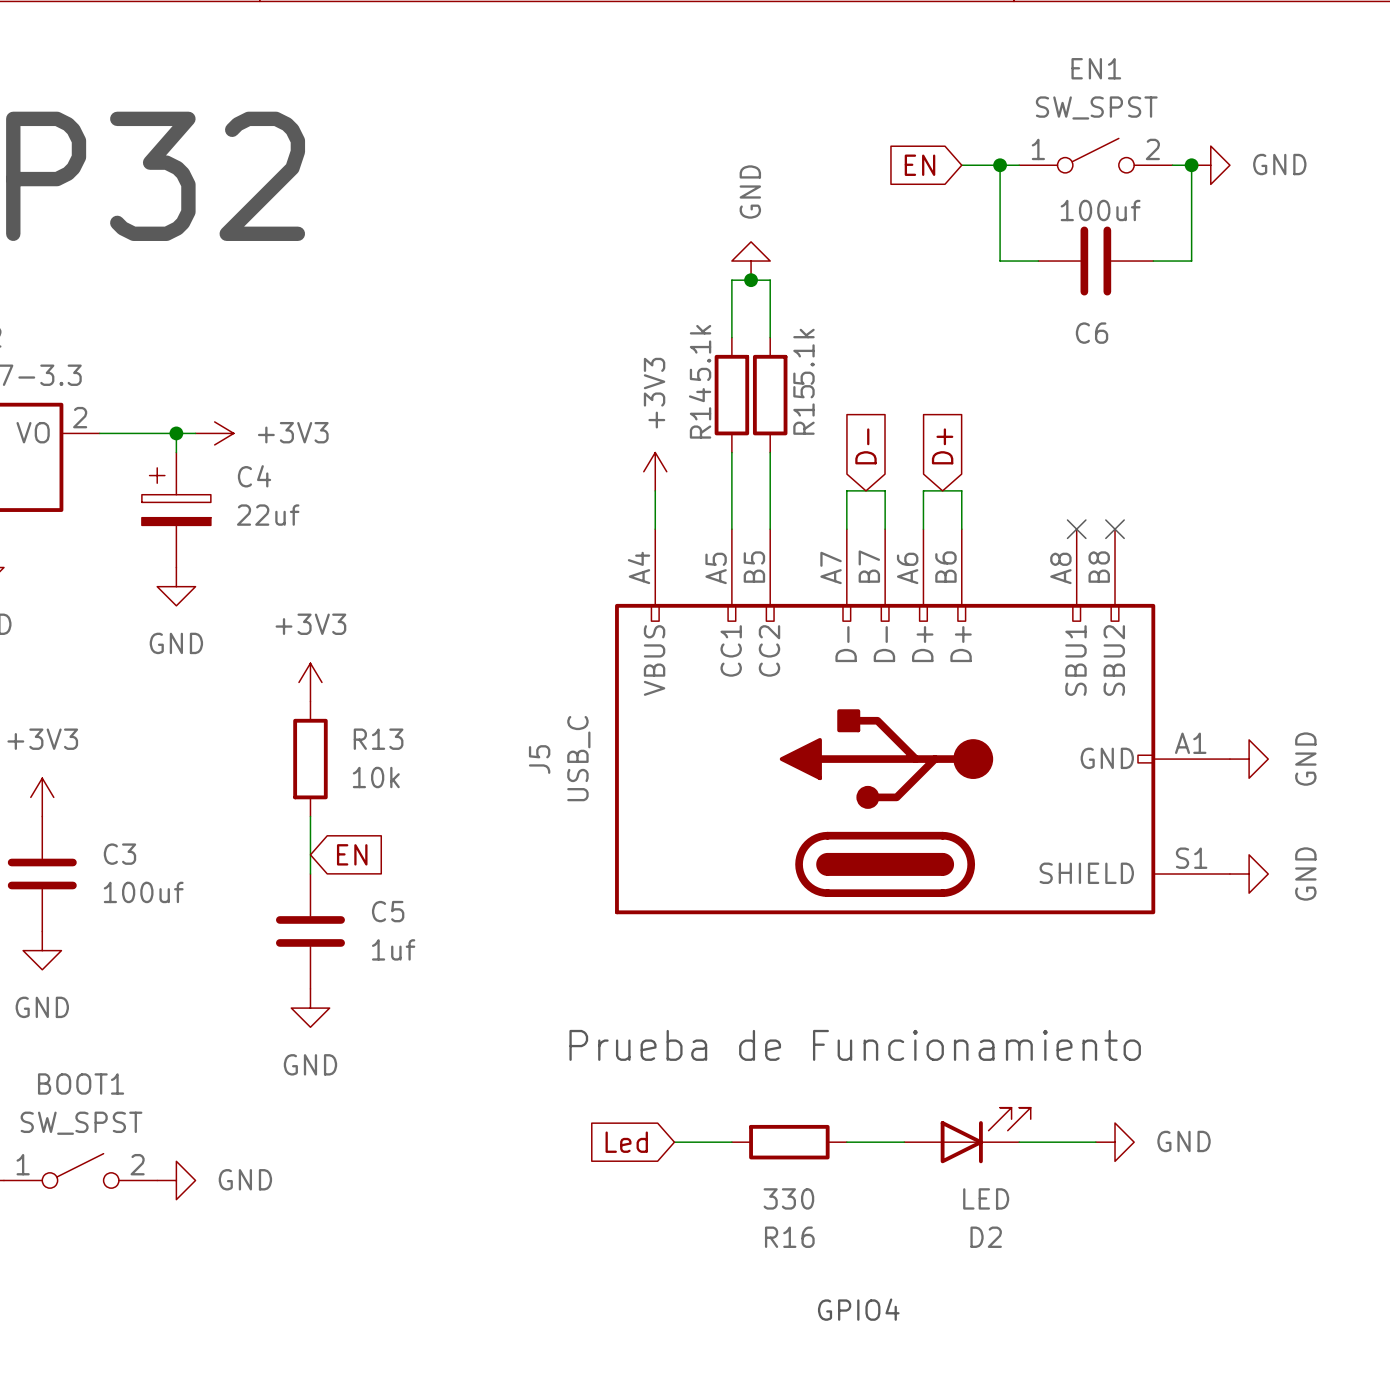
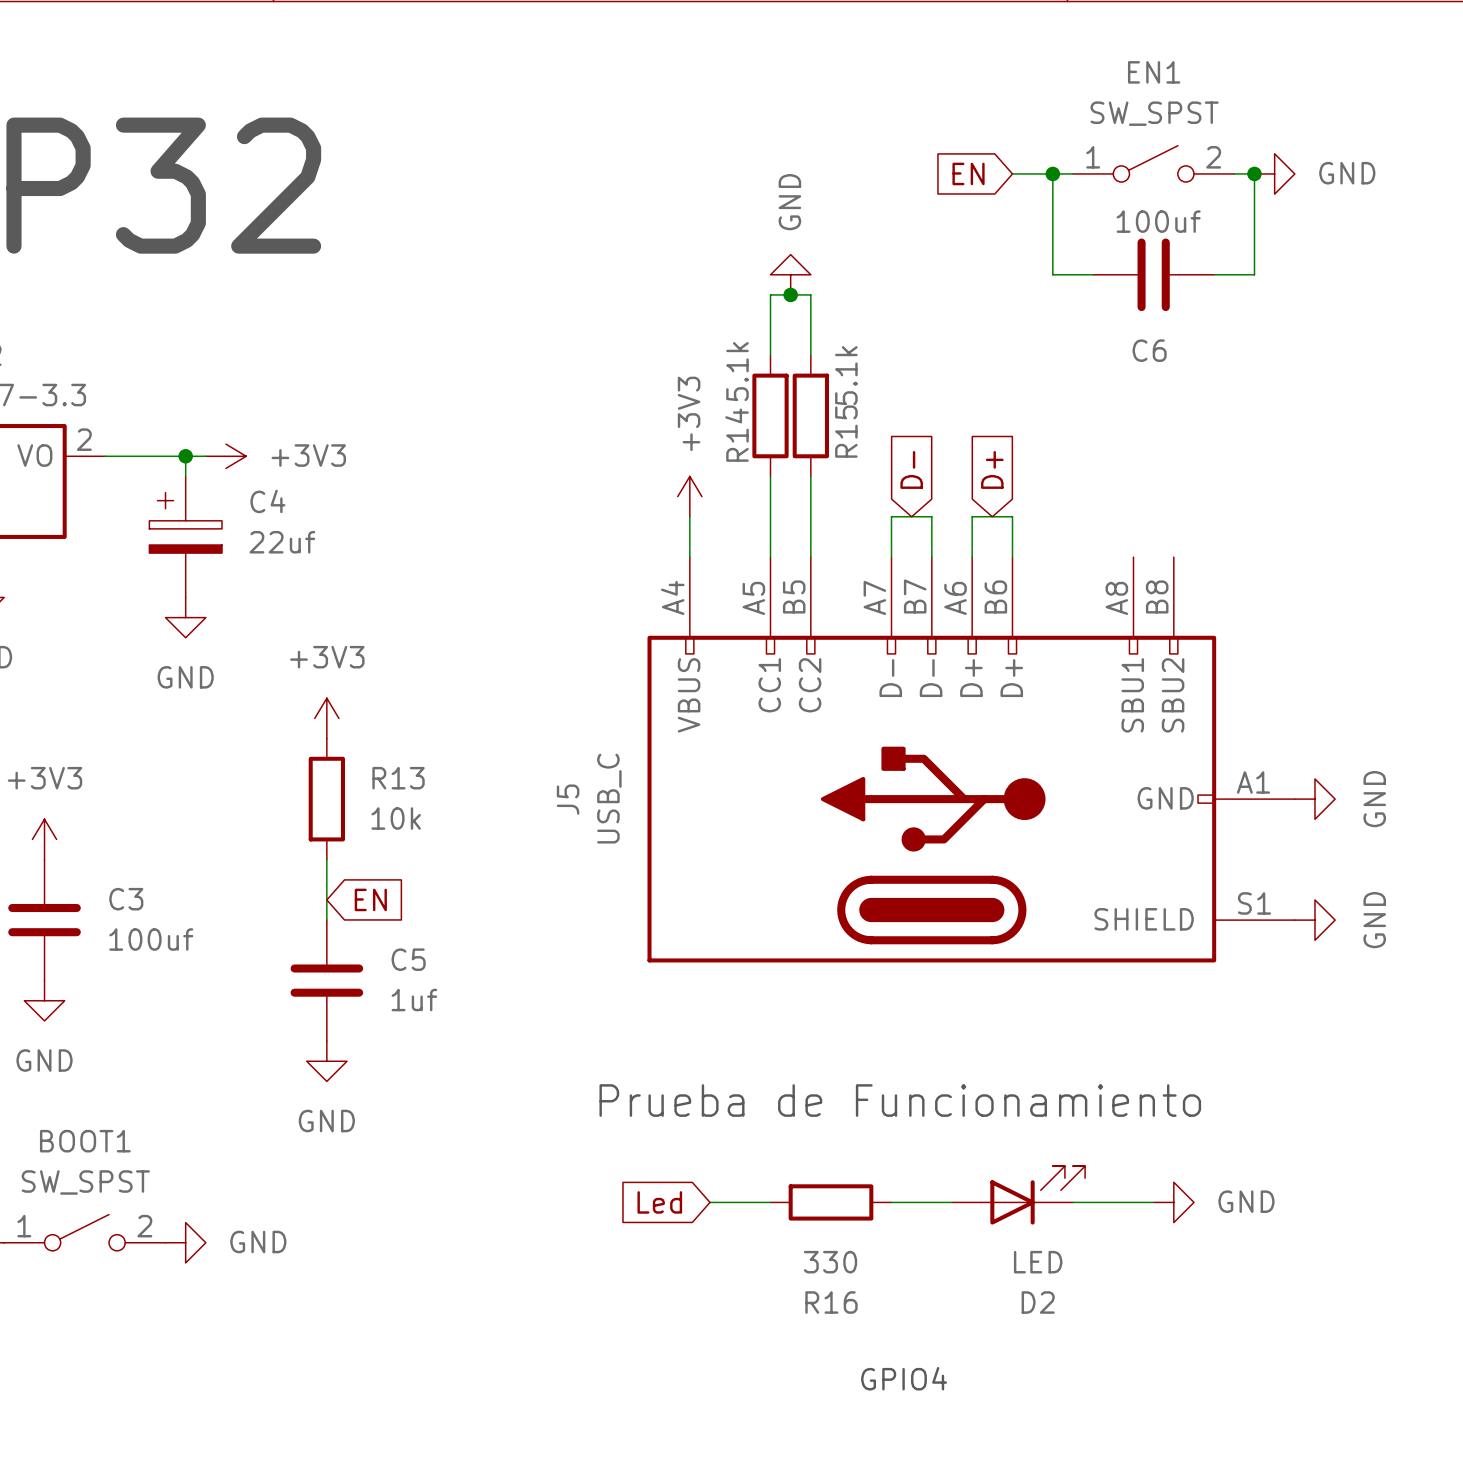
no-connect mark: (1076, 529) -> none
no-connect mark: (1115, 529) -> none

